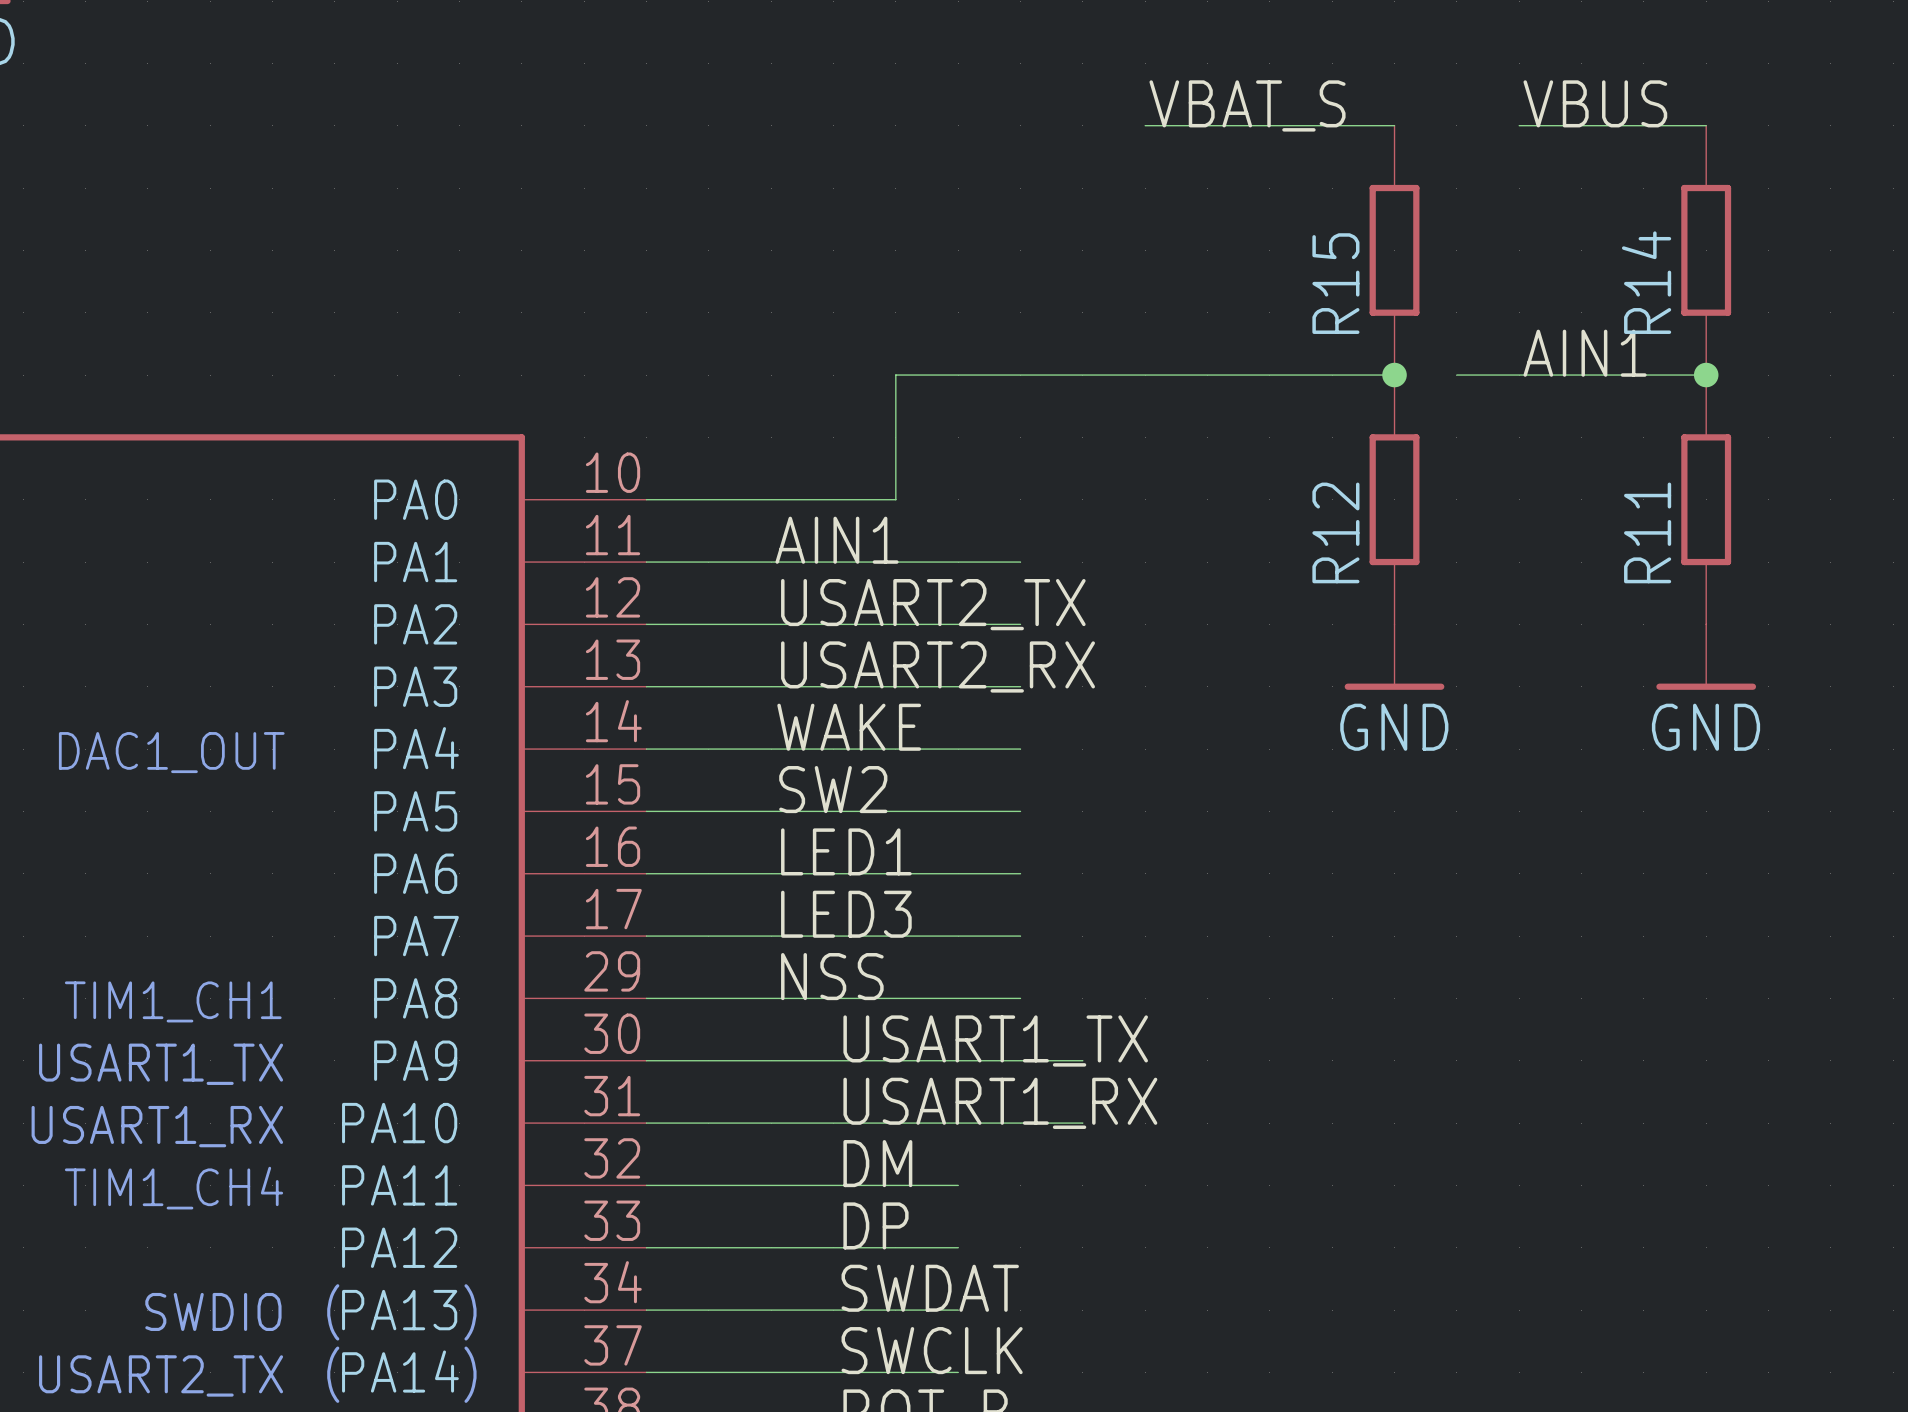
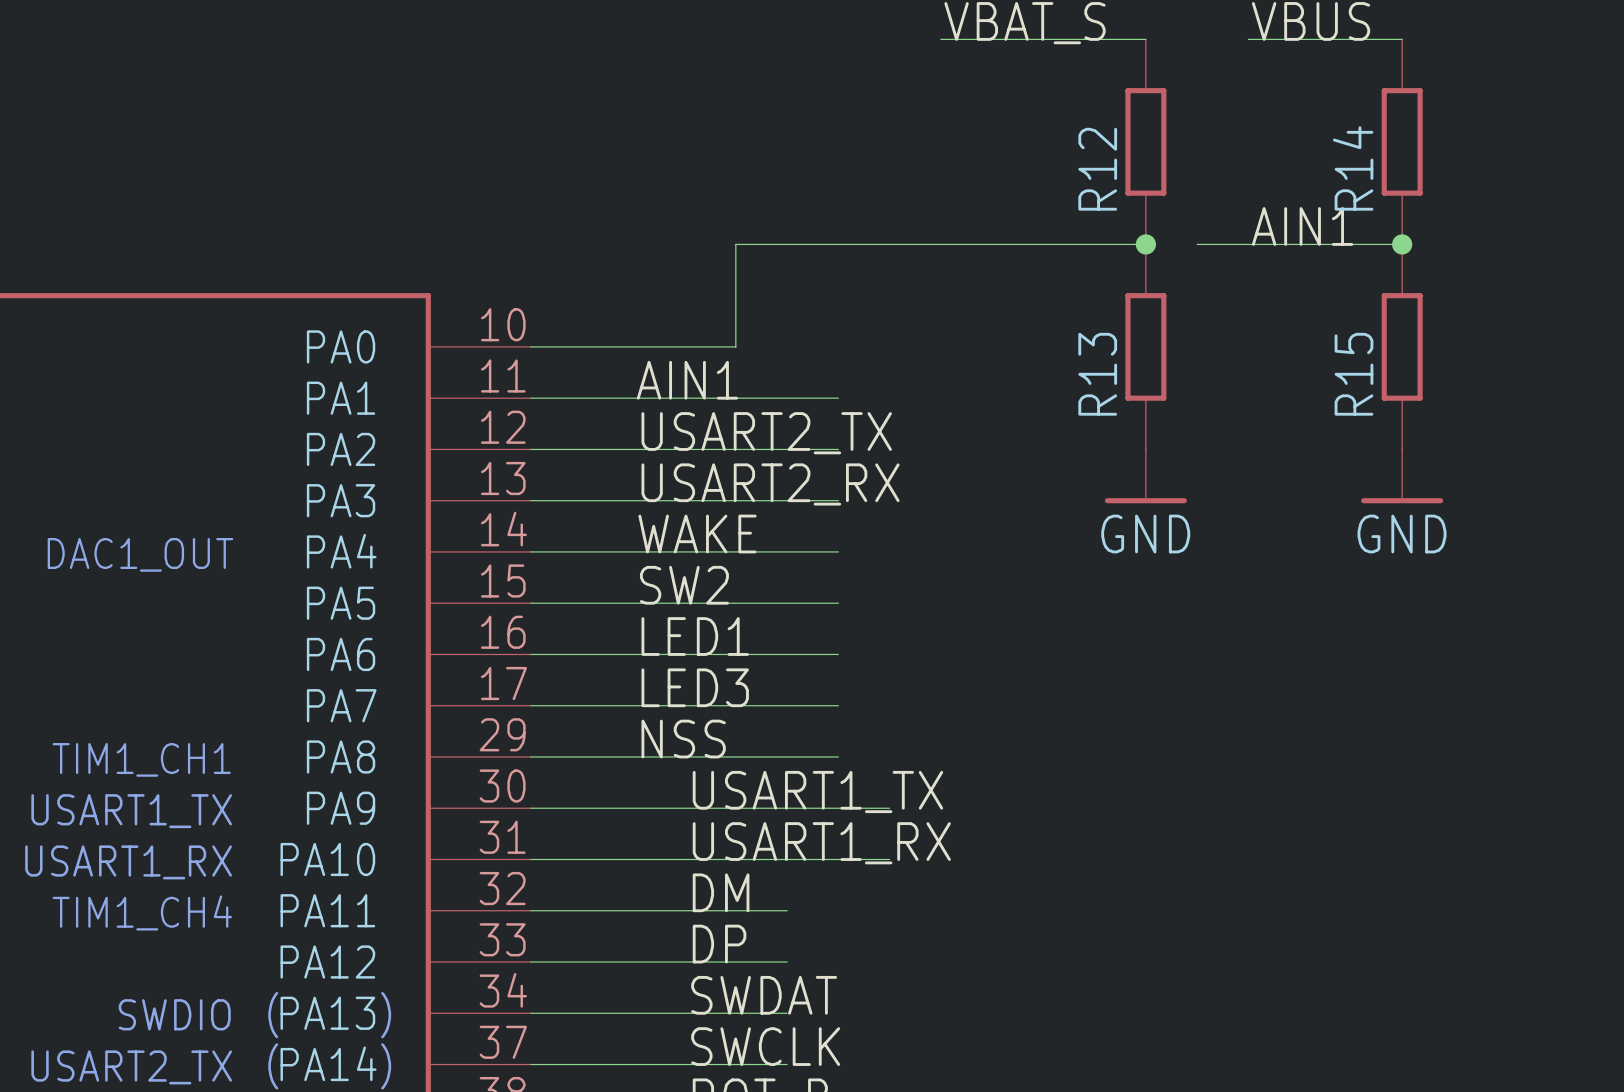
R15 name: R15 (1335, 283) -> R12 (1097, 169)
R12 name: R12 (1335, 532) -> R13 (1097, 374)
R11 name: R11 (1647, 532) -> R15 (1353, 374)

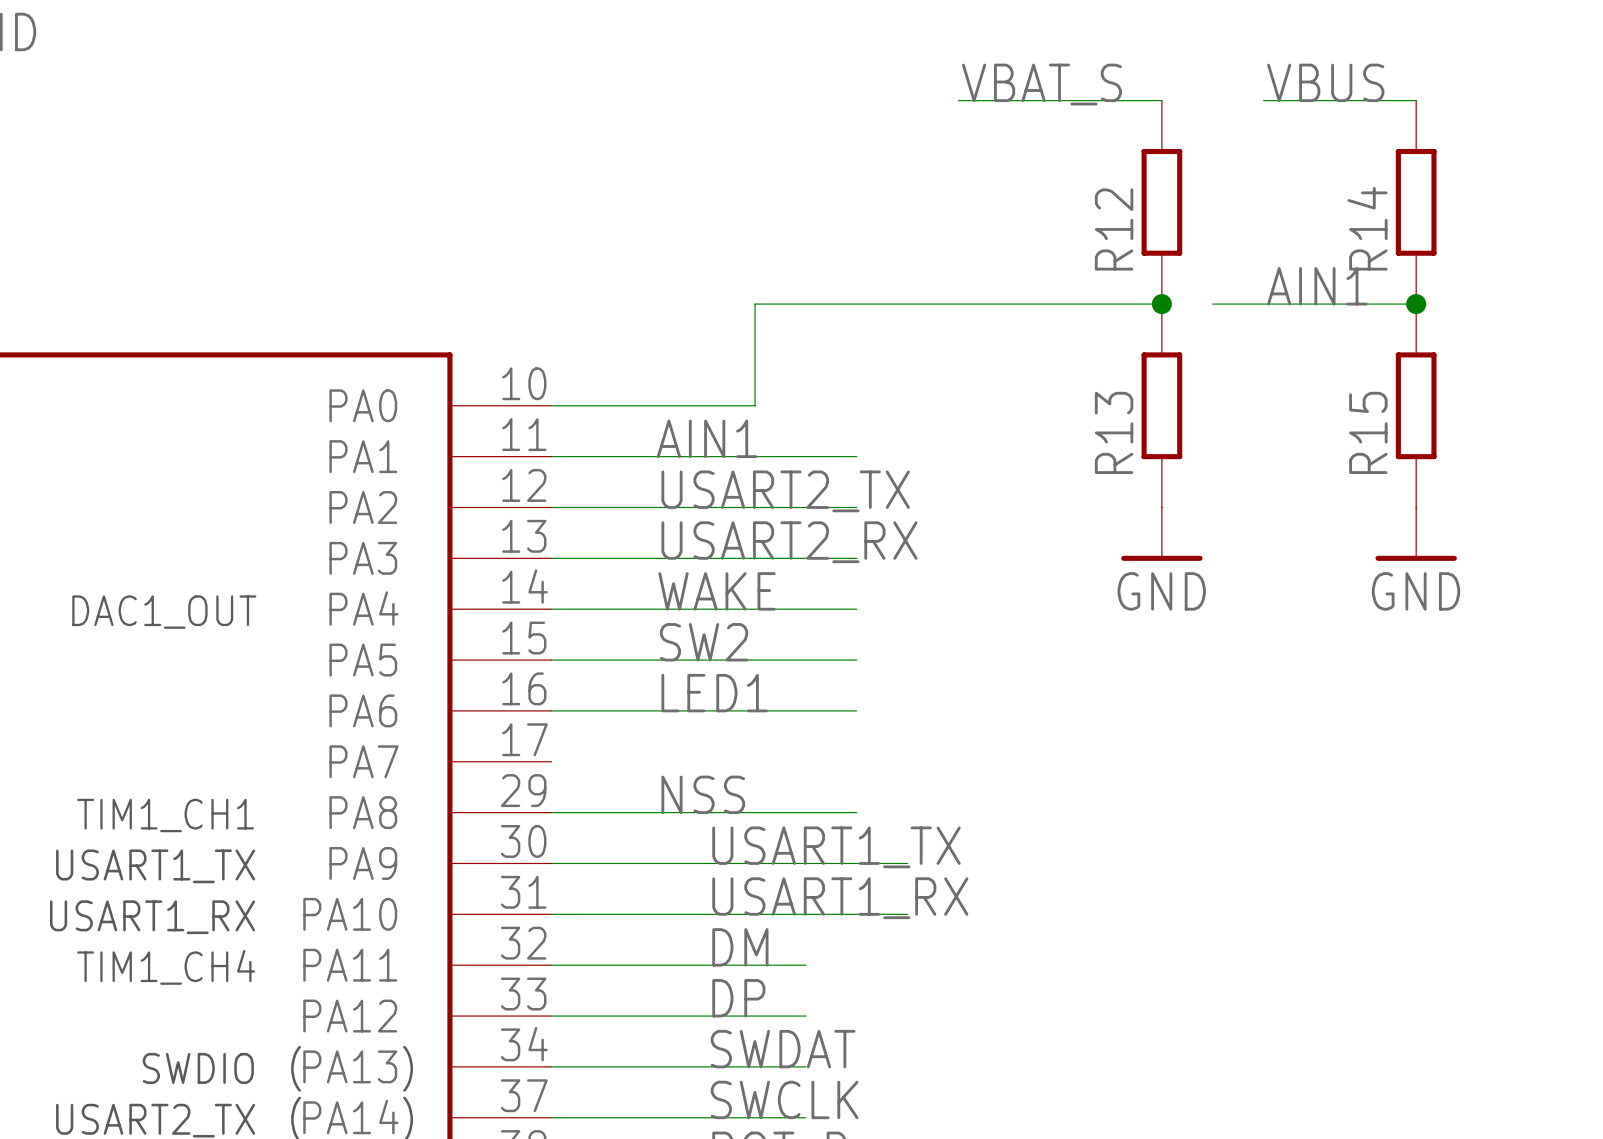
label: LED3 (695, 687) -> none
wire: (530, 705) (838, 705) -> none

